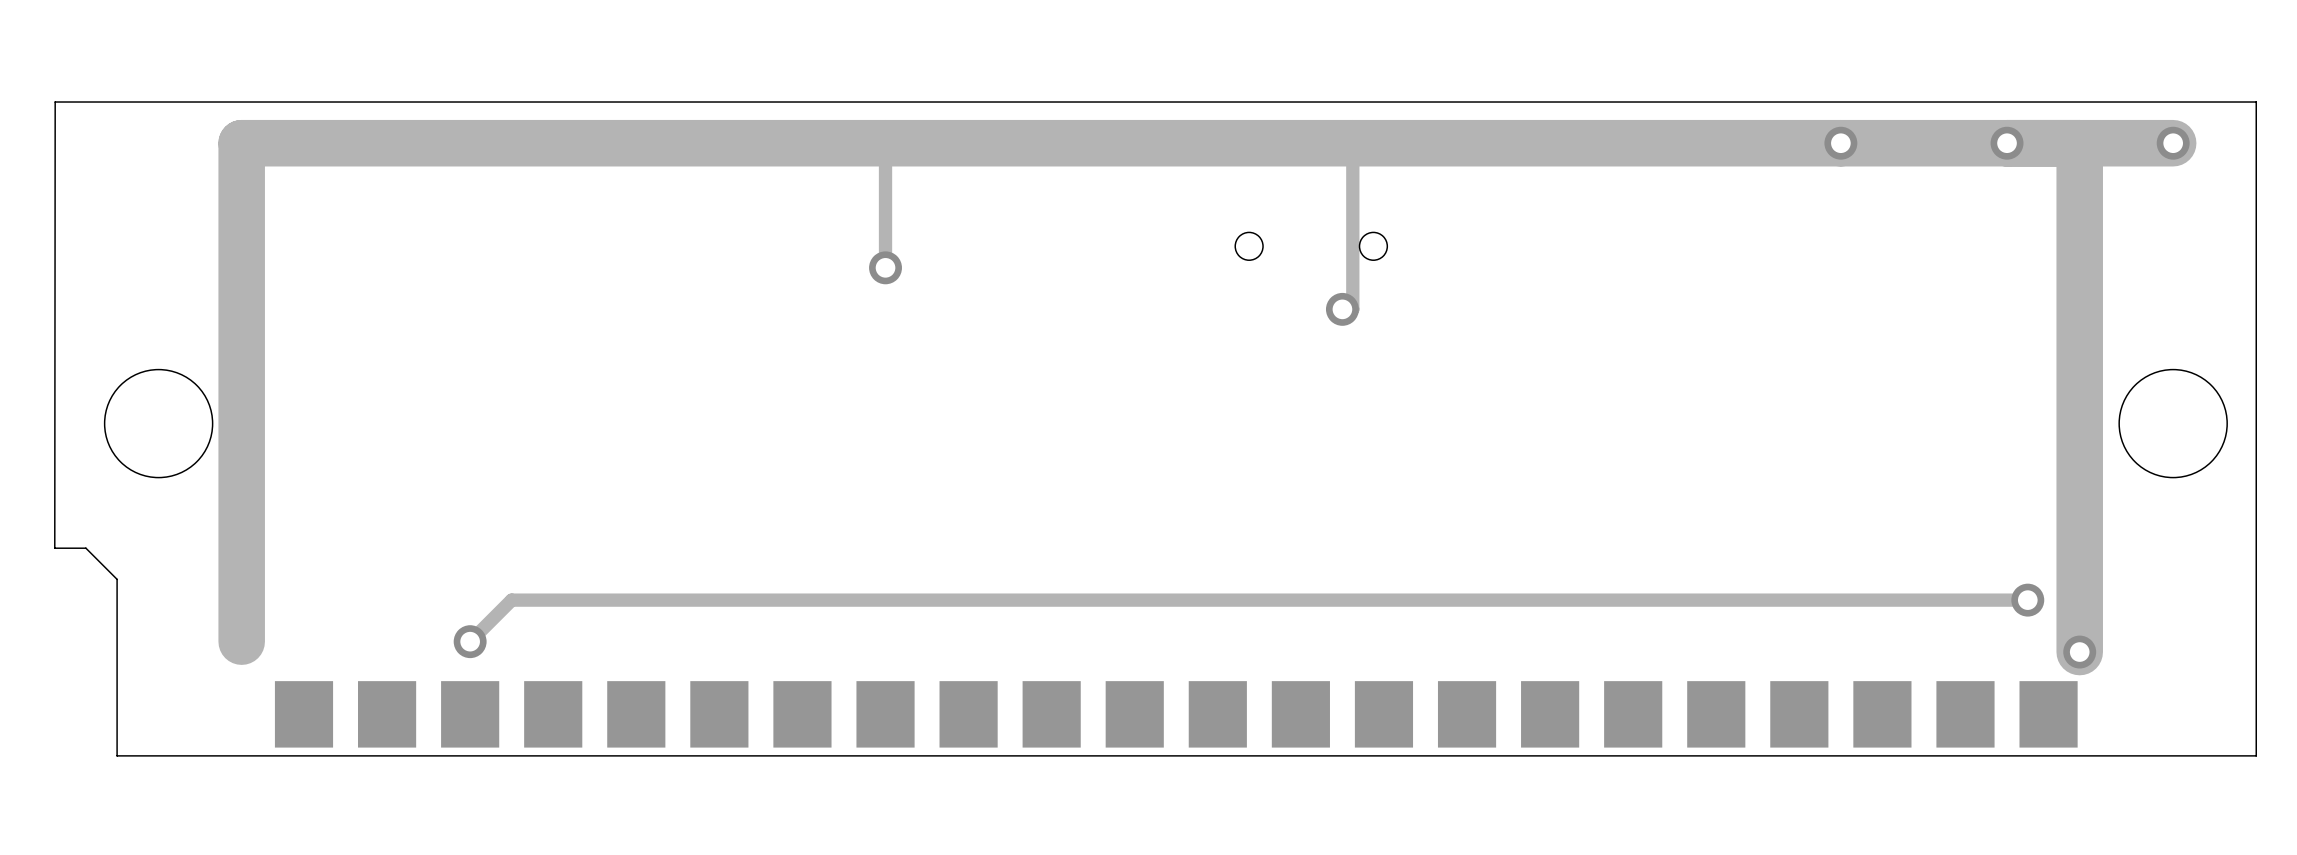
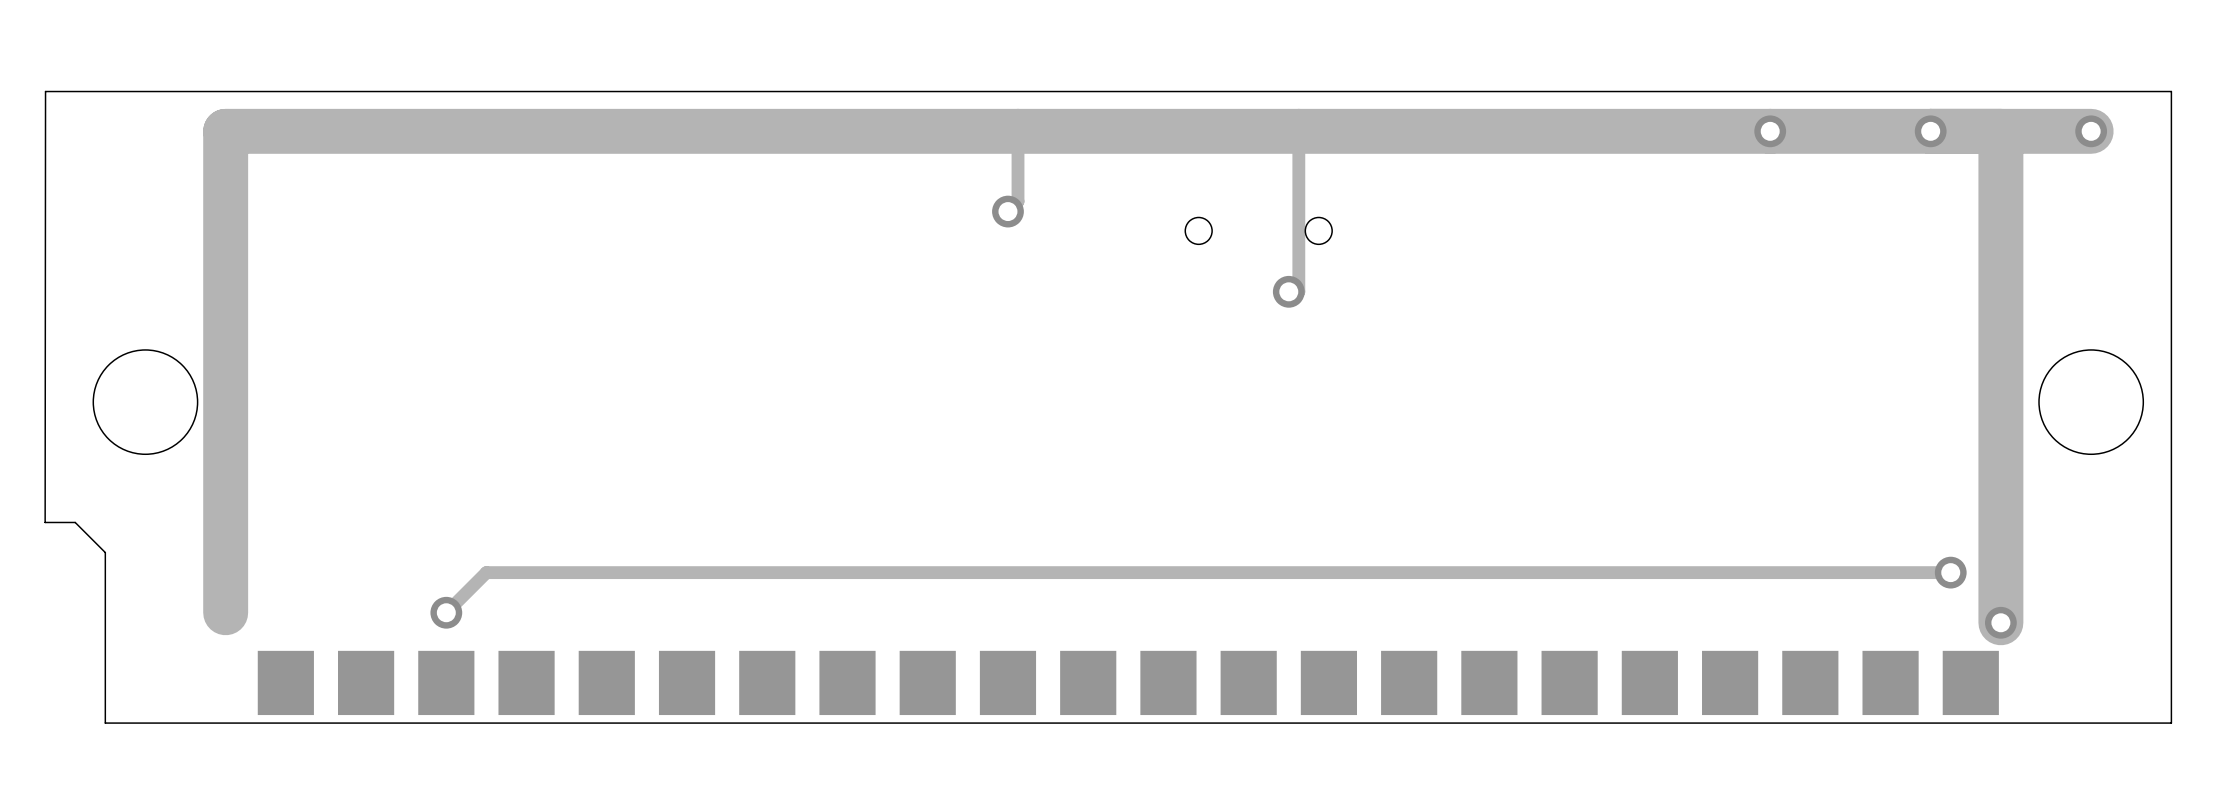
track: (885, 143) (885, 267) -> none
track: none -> (1018, 131) (1018, 201) (1007, 211)
via position: (885, 267) -> (1007, 211)

